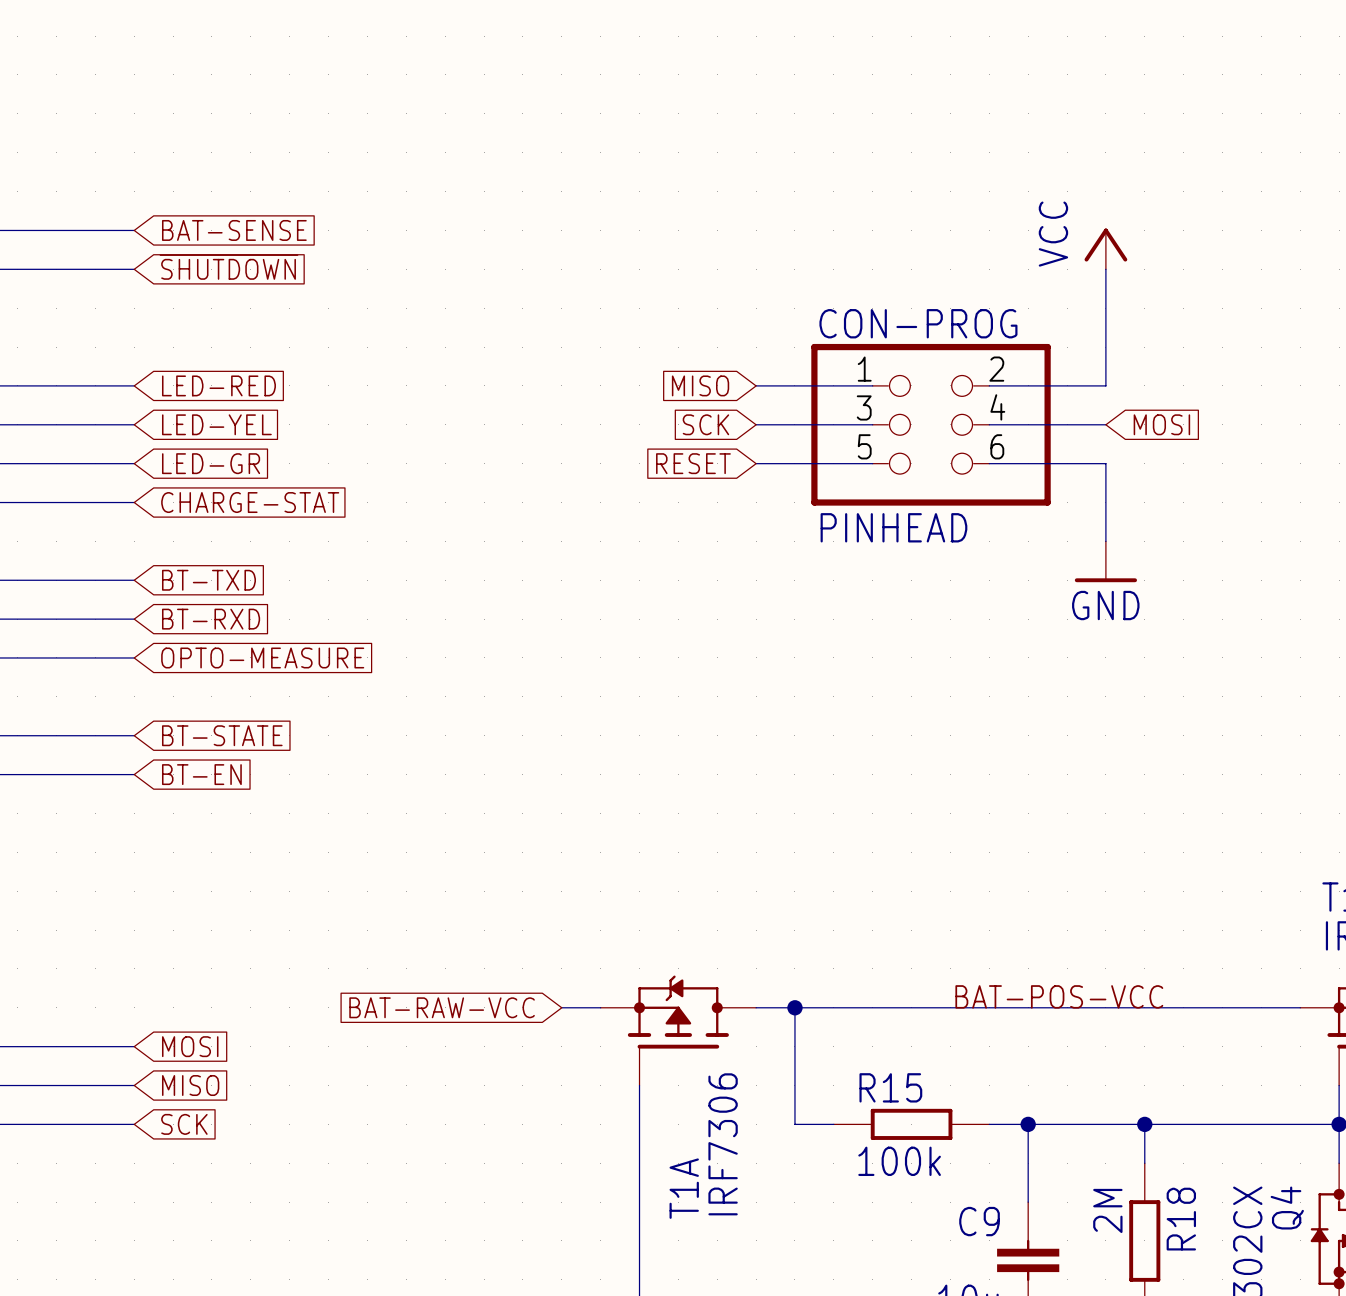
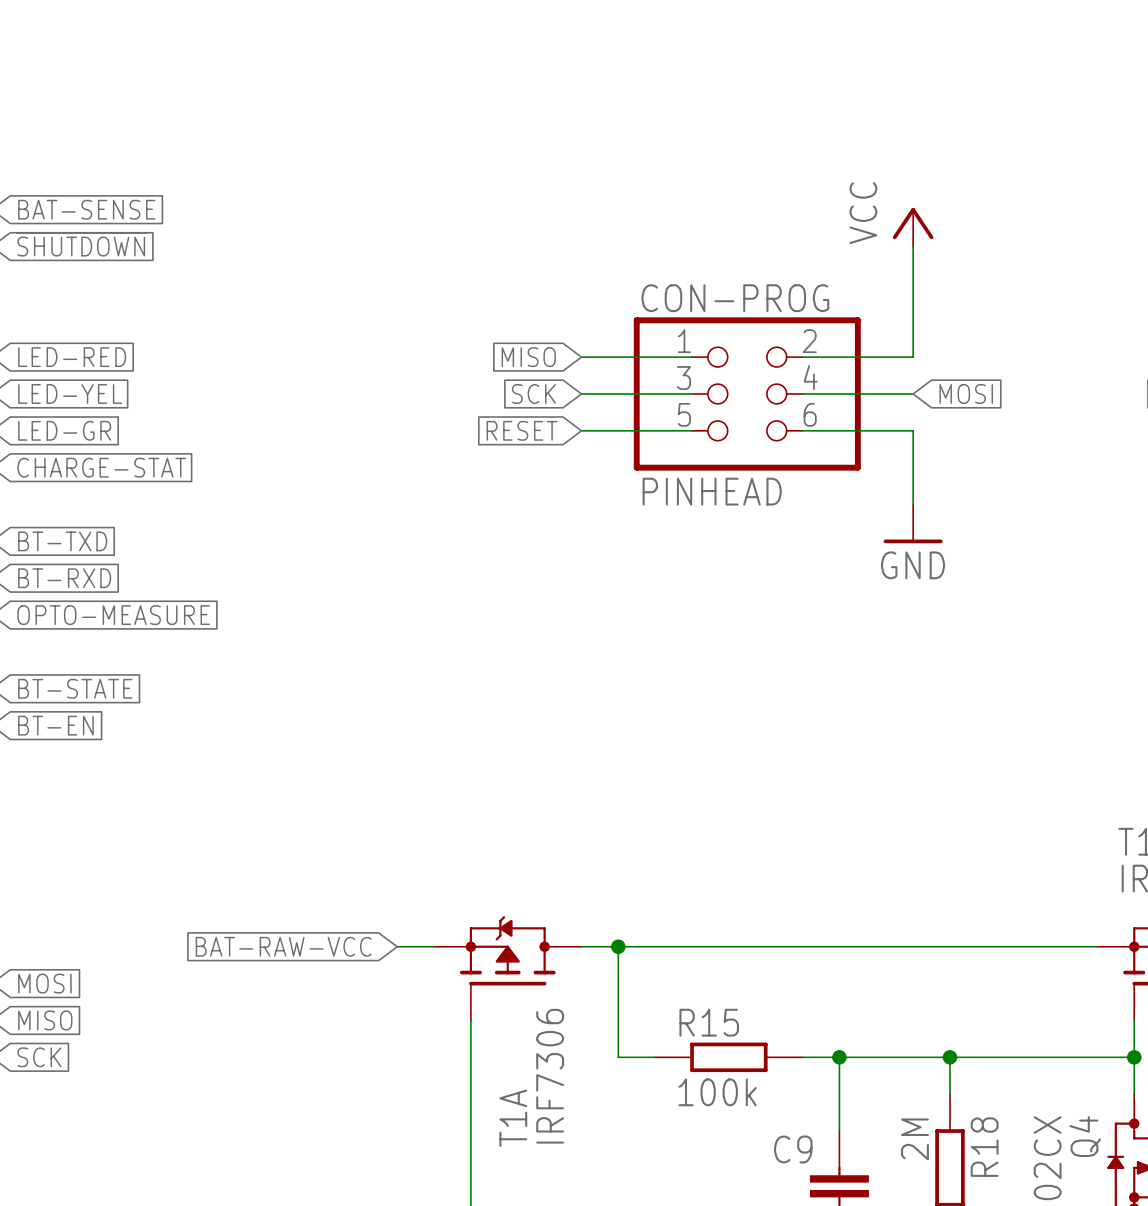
label: BAT-POS-VCC (1059, 996) -> none

